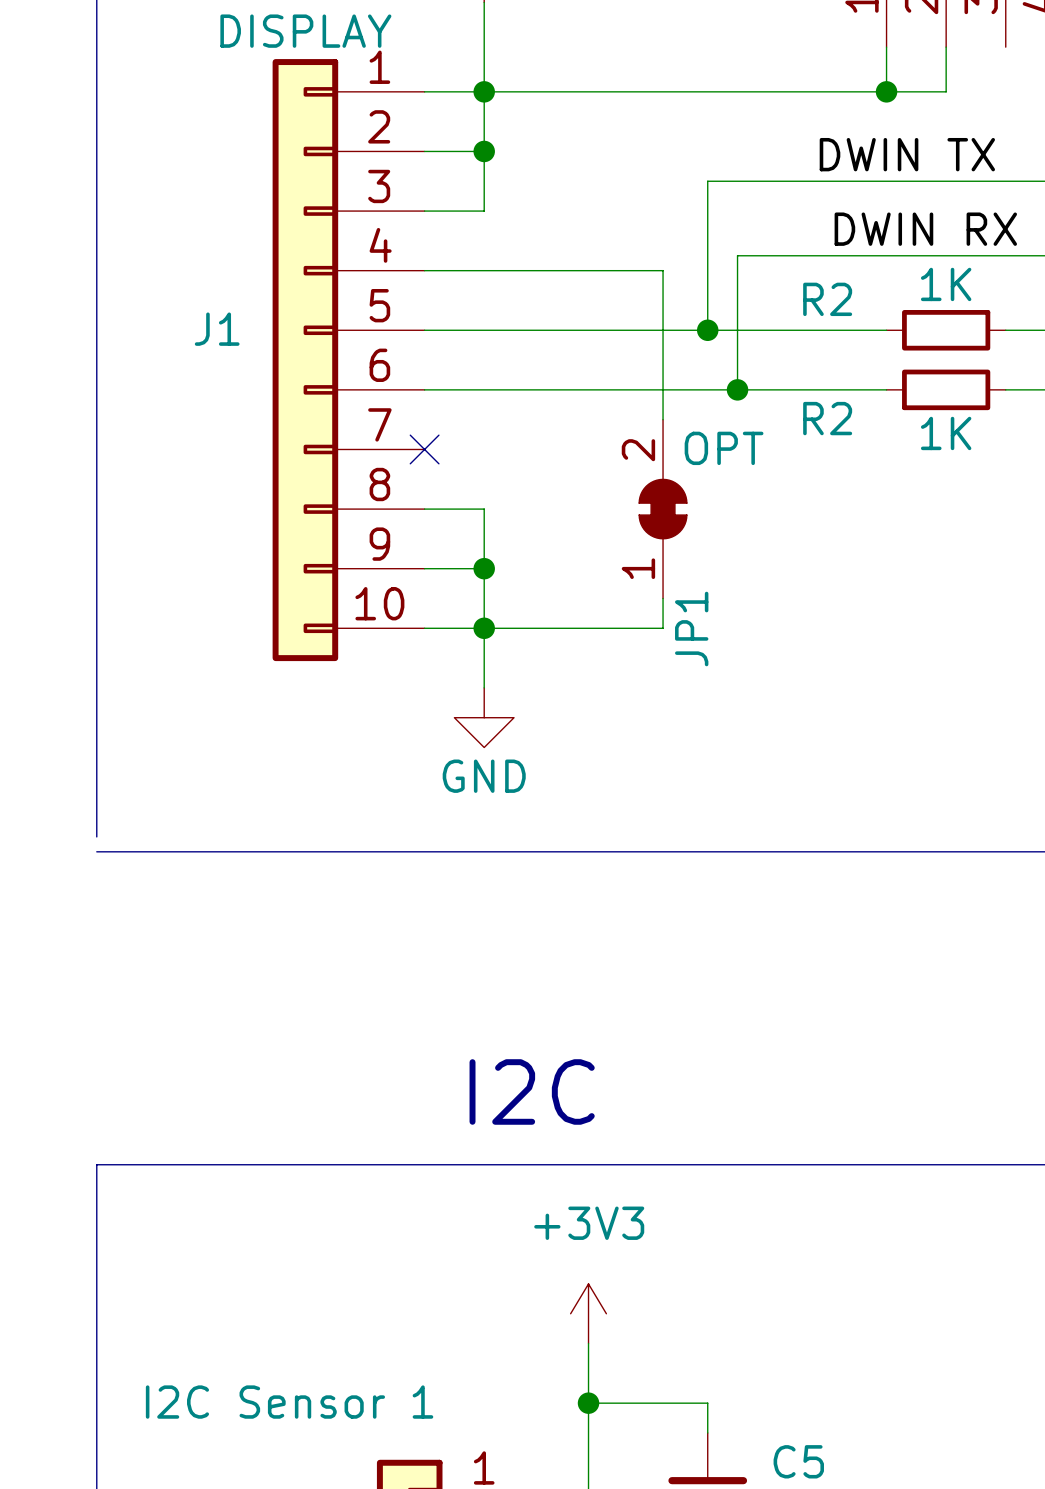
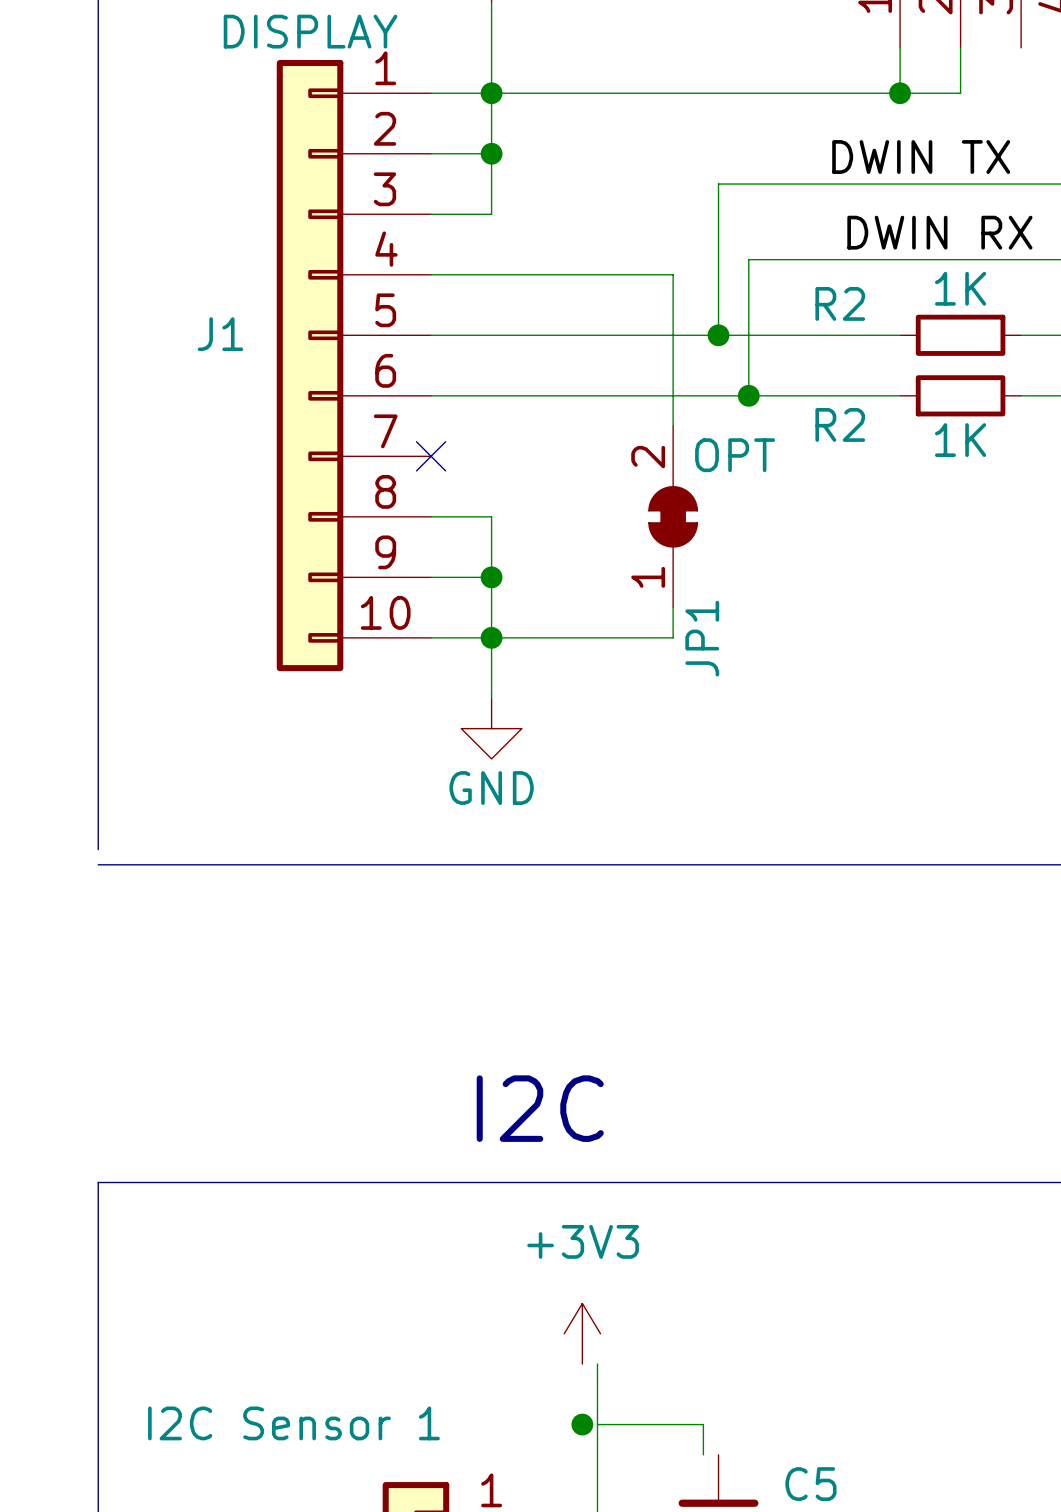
power symbol position: +3V3 (588, 1313) -> +3V3 (582, 1333)
junction position: (588, 1403) -> (582, 1424)
wire: (692, 1403) (707, 1403) (707, 1432) -> (703, 1424) (703, 1454)

